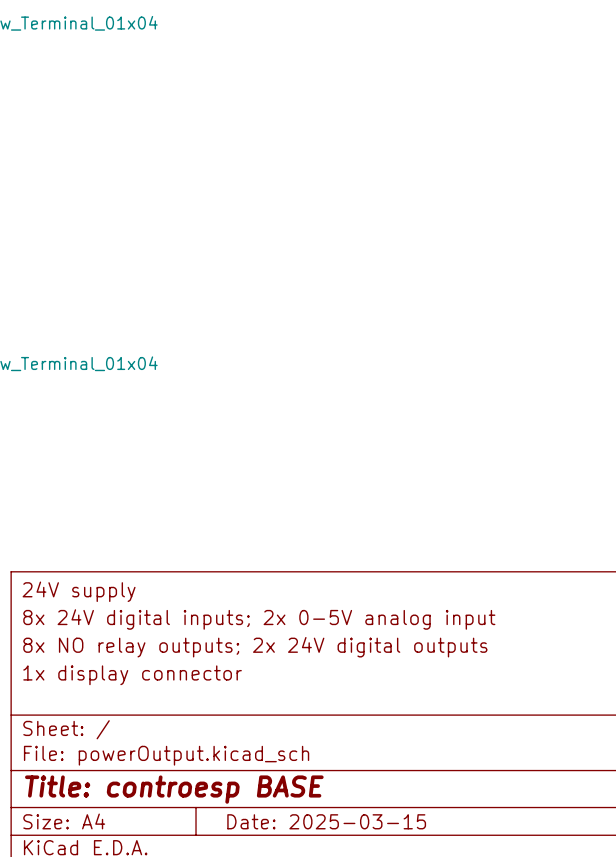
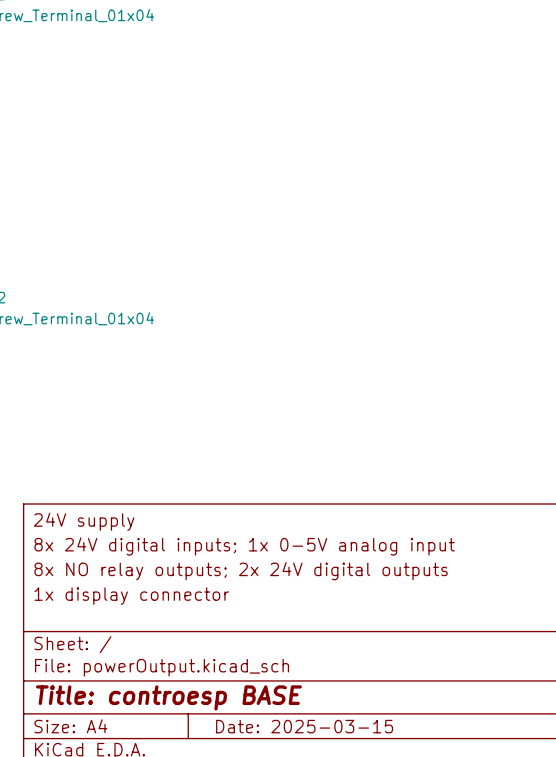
title block: 8x 24V digital inputs; 2x 0-5V analog input (259, 619) -> 8x 24V digital inputs; 1x 0-5V analog input (244, 546)

